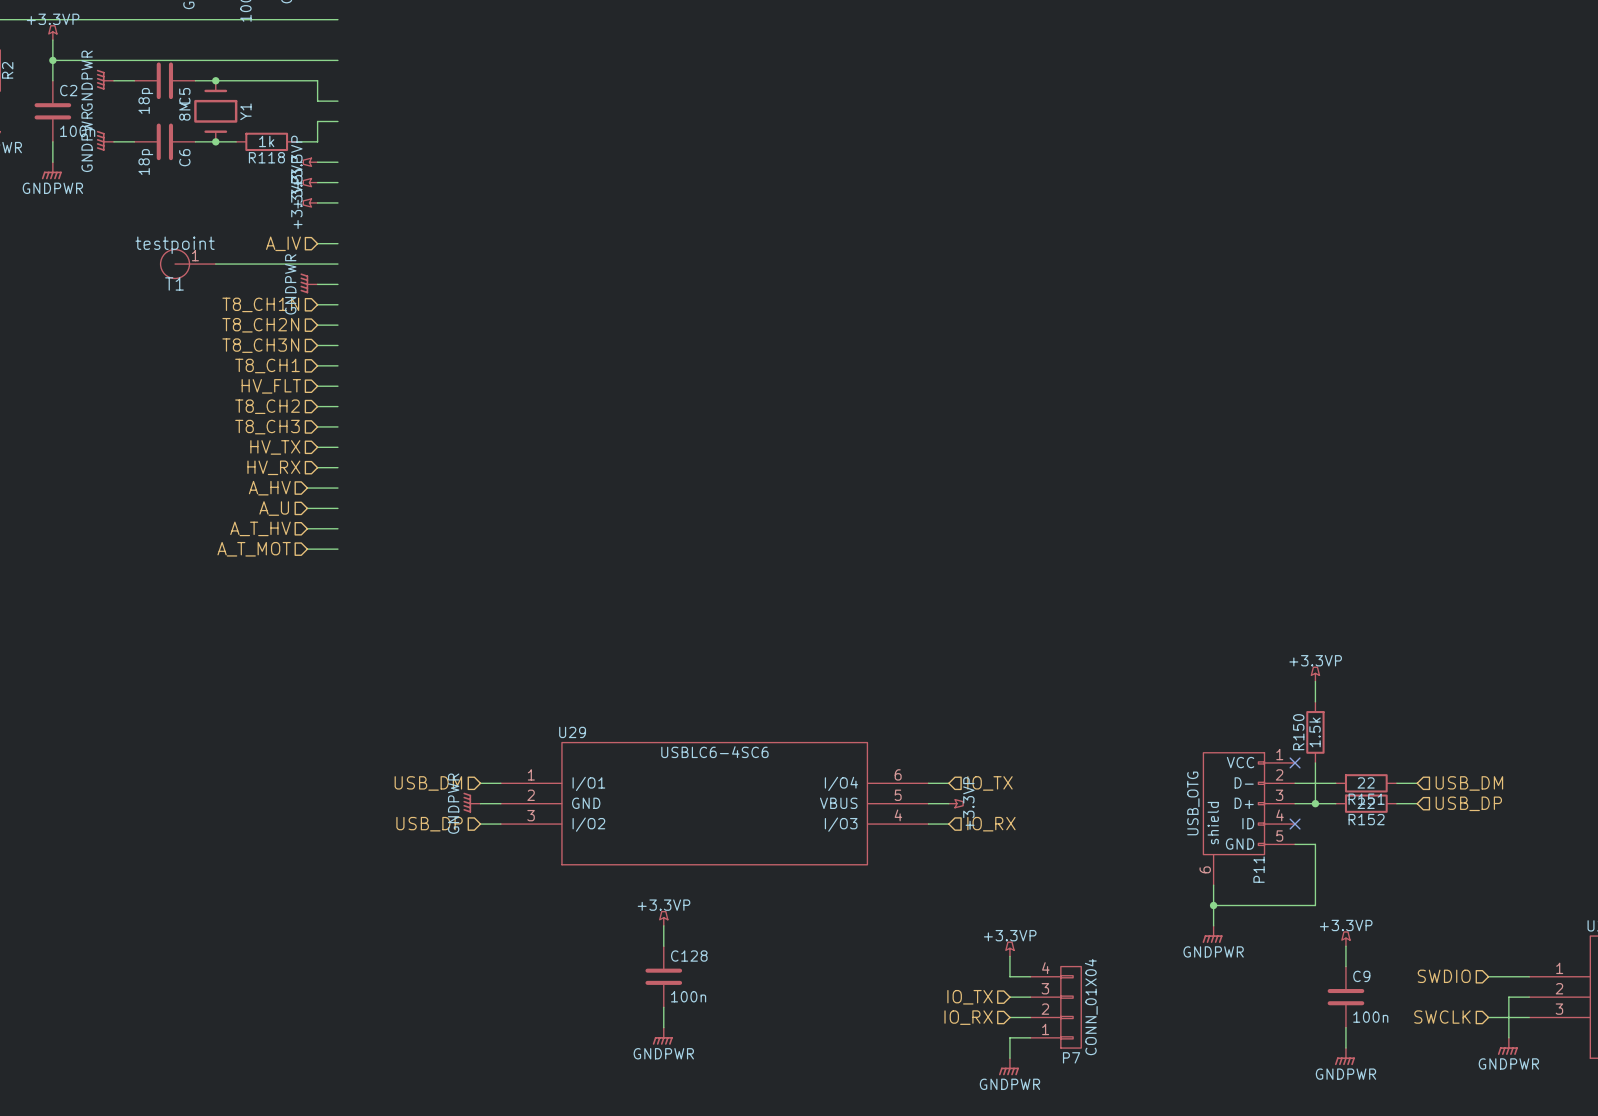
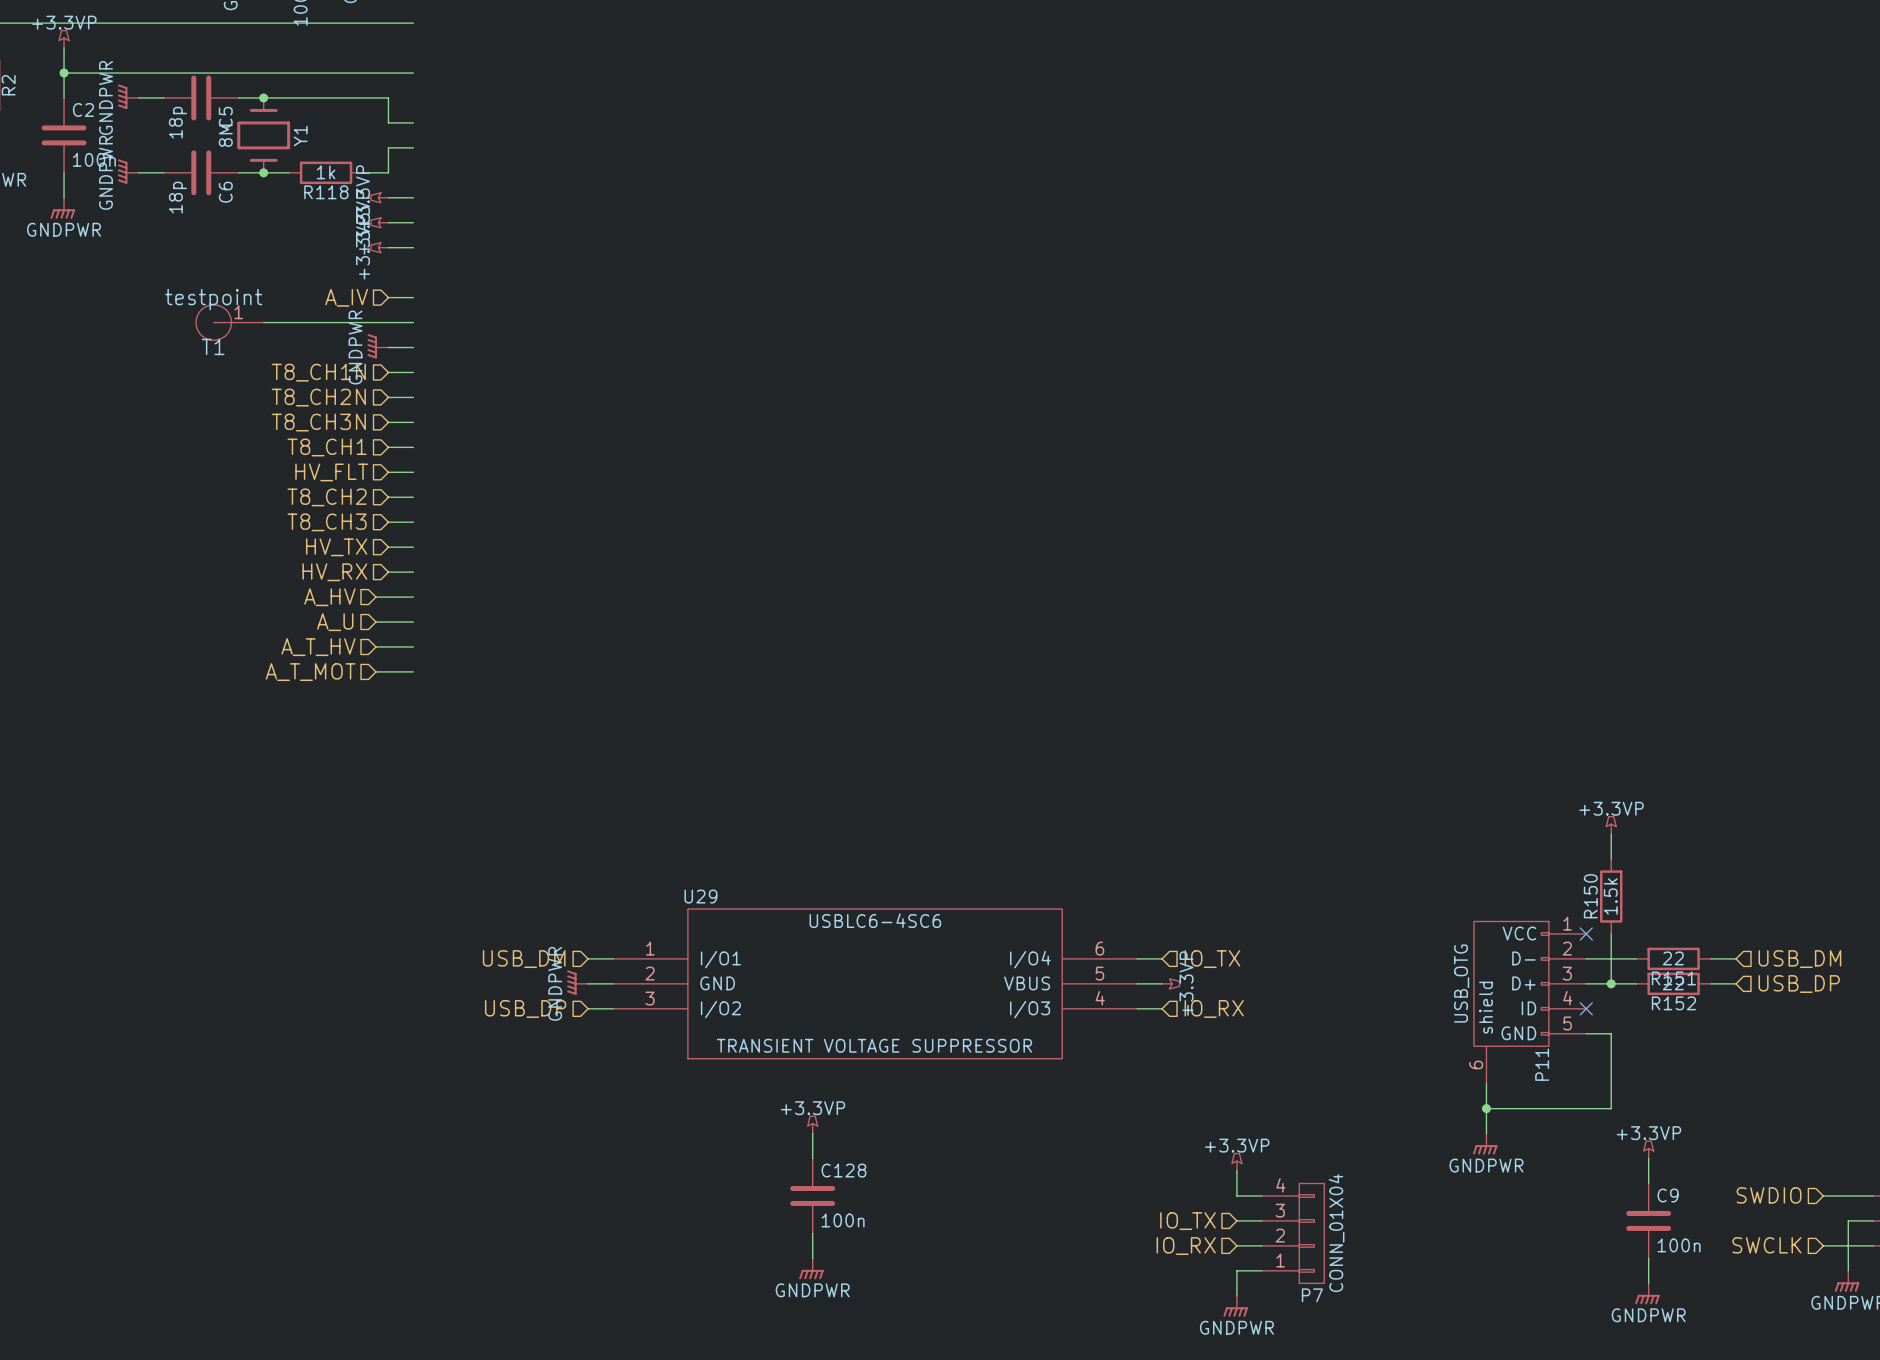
U29 text: none -> TRANSIENT VOLTAGE SUPPRESSOR (874, 1045)

